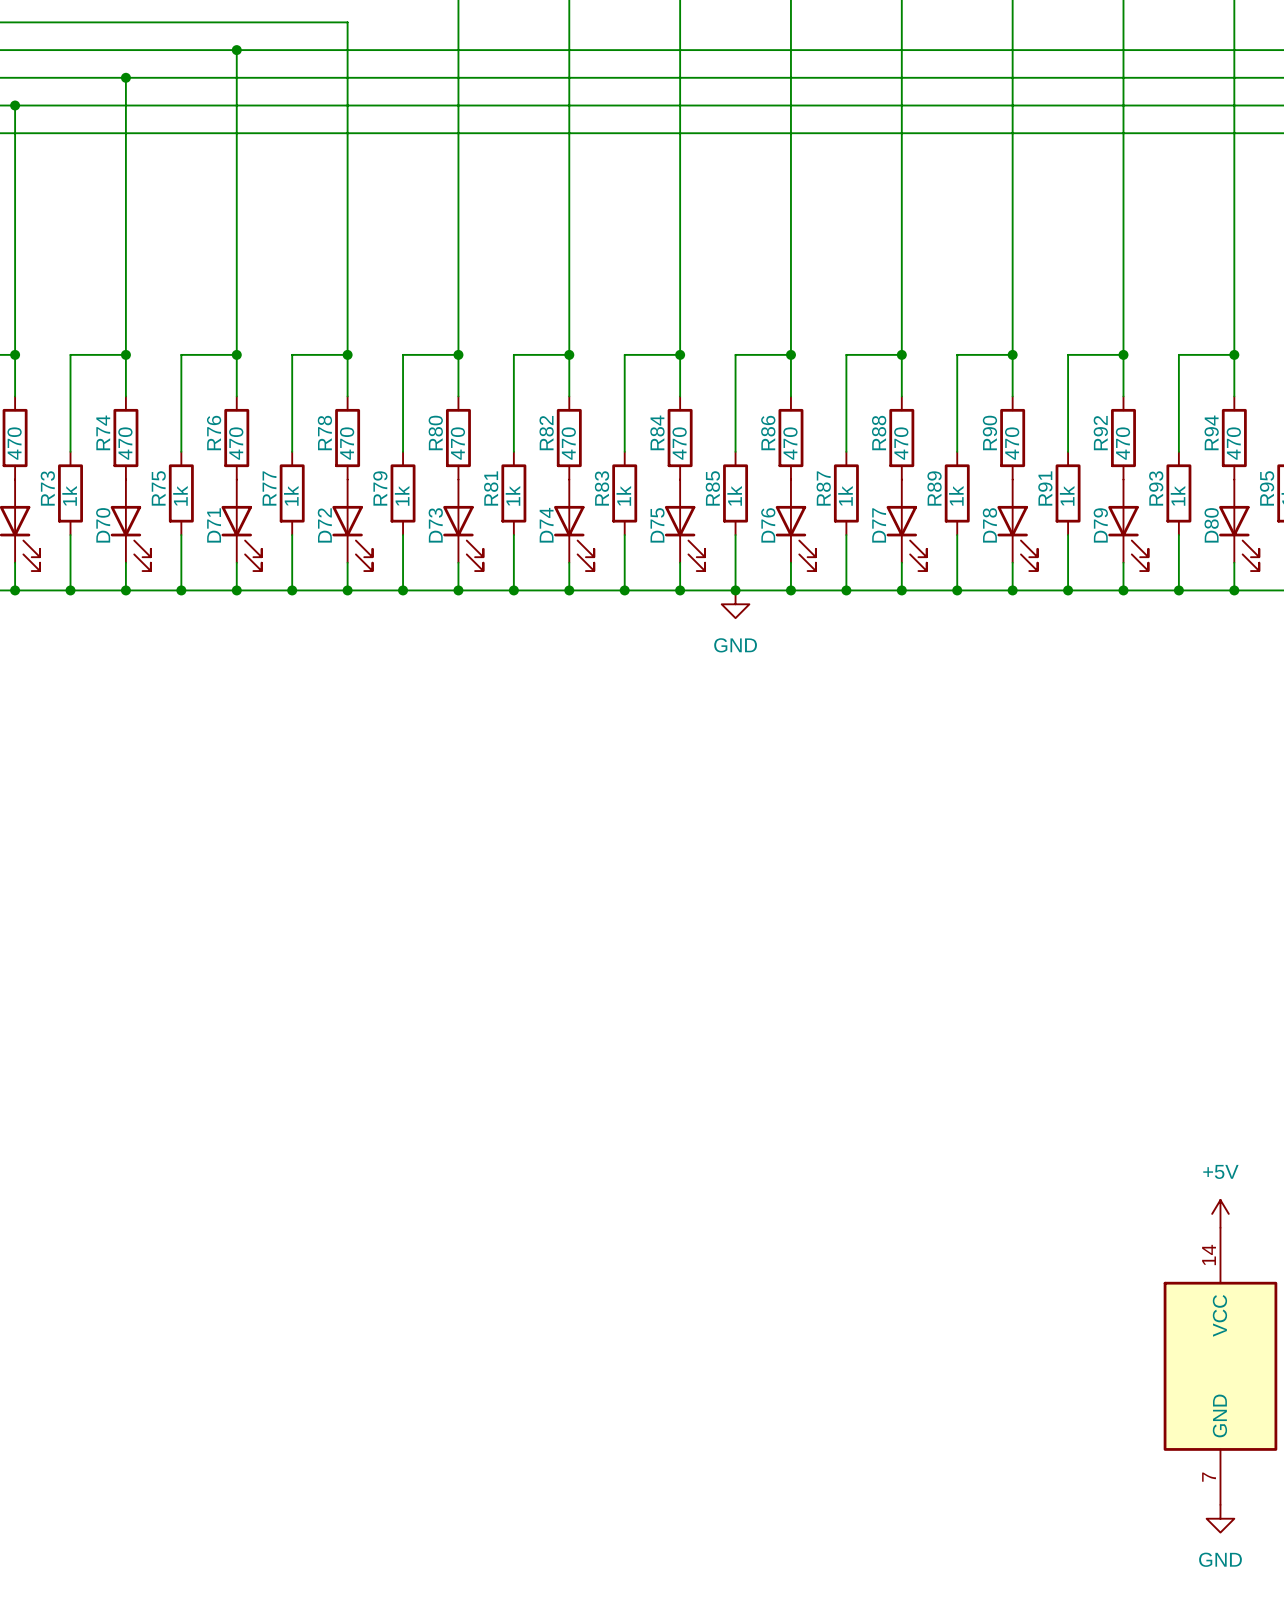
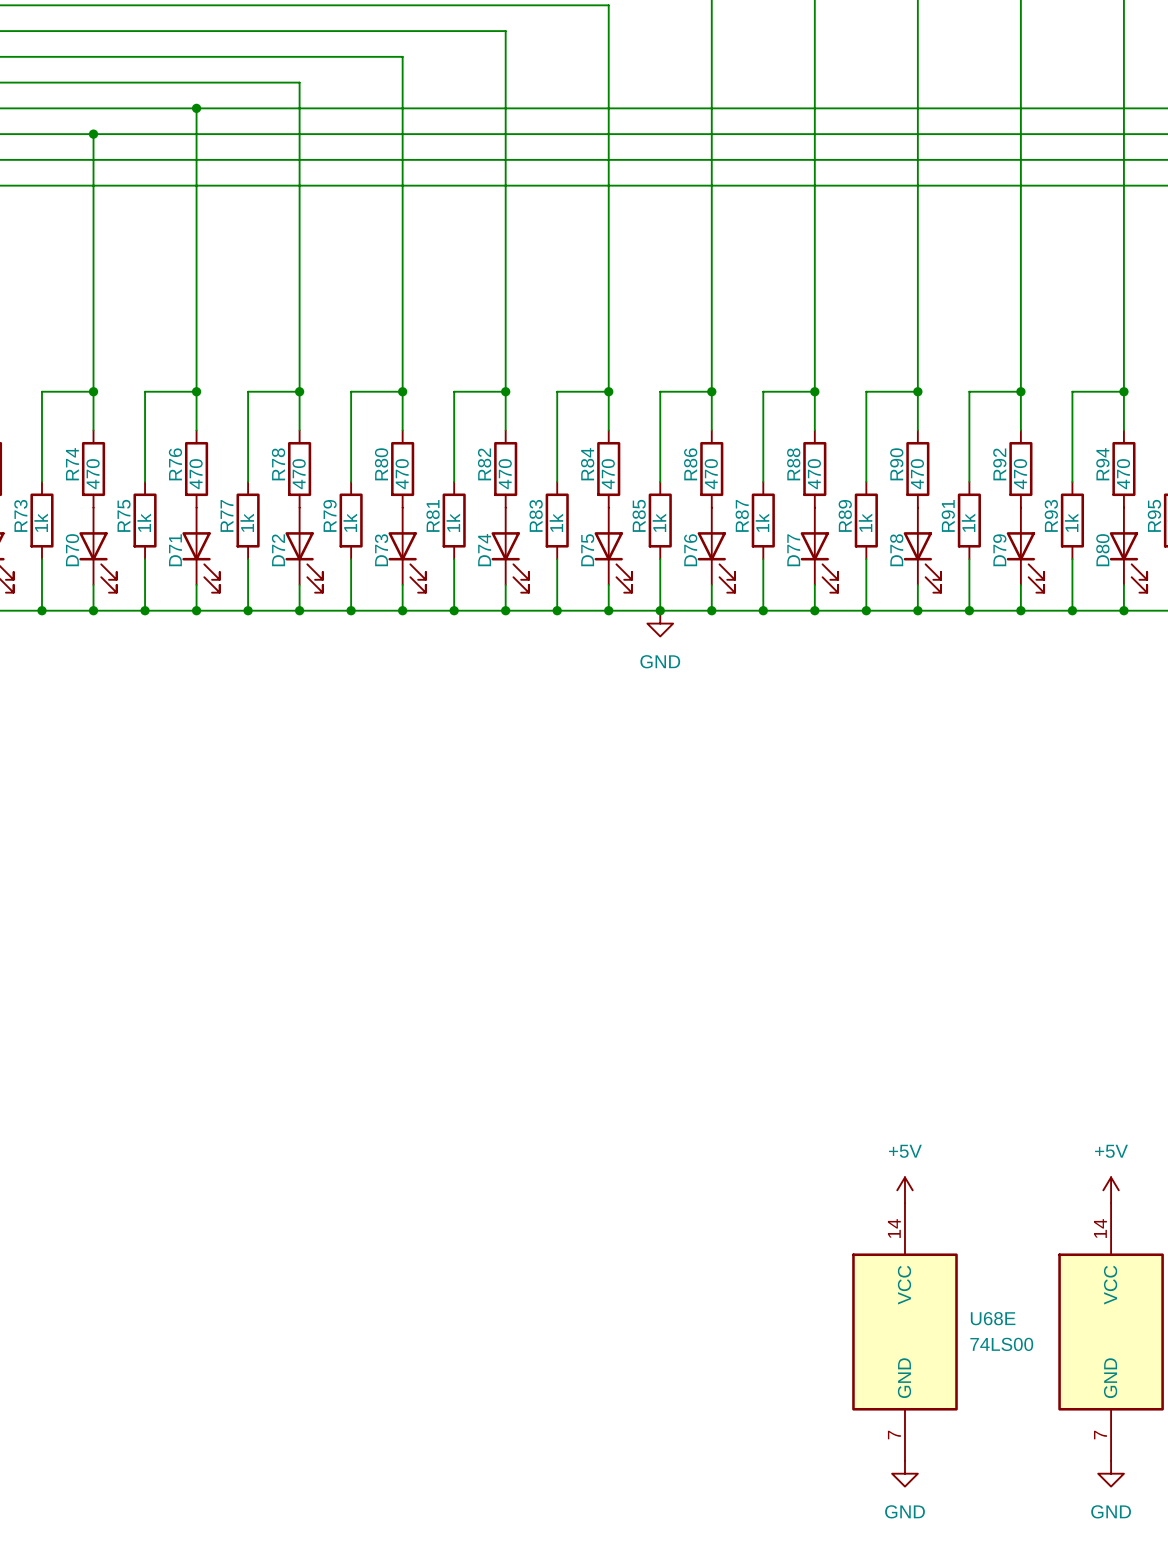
power symbol: none -> +5V (904, 1190)
U68E: none -> 74LS00 (904, 1332)
power symbol: none -> GND (904, 1473)

